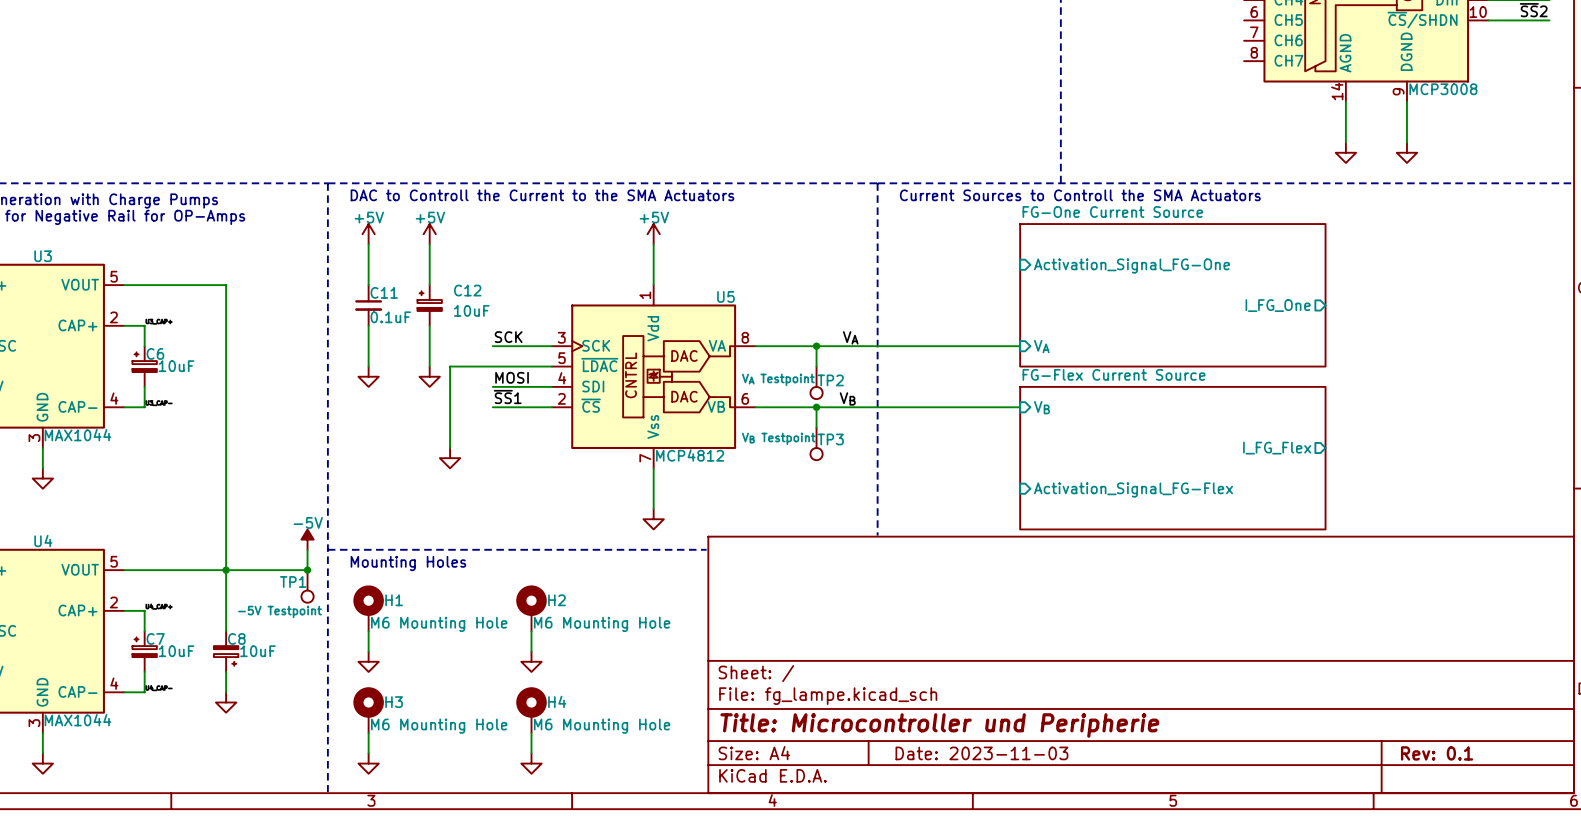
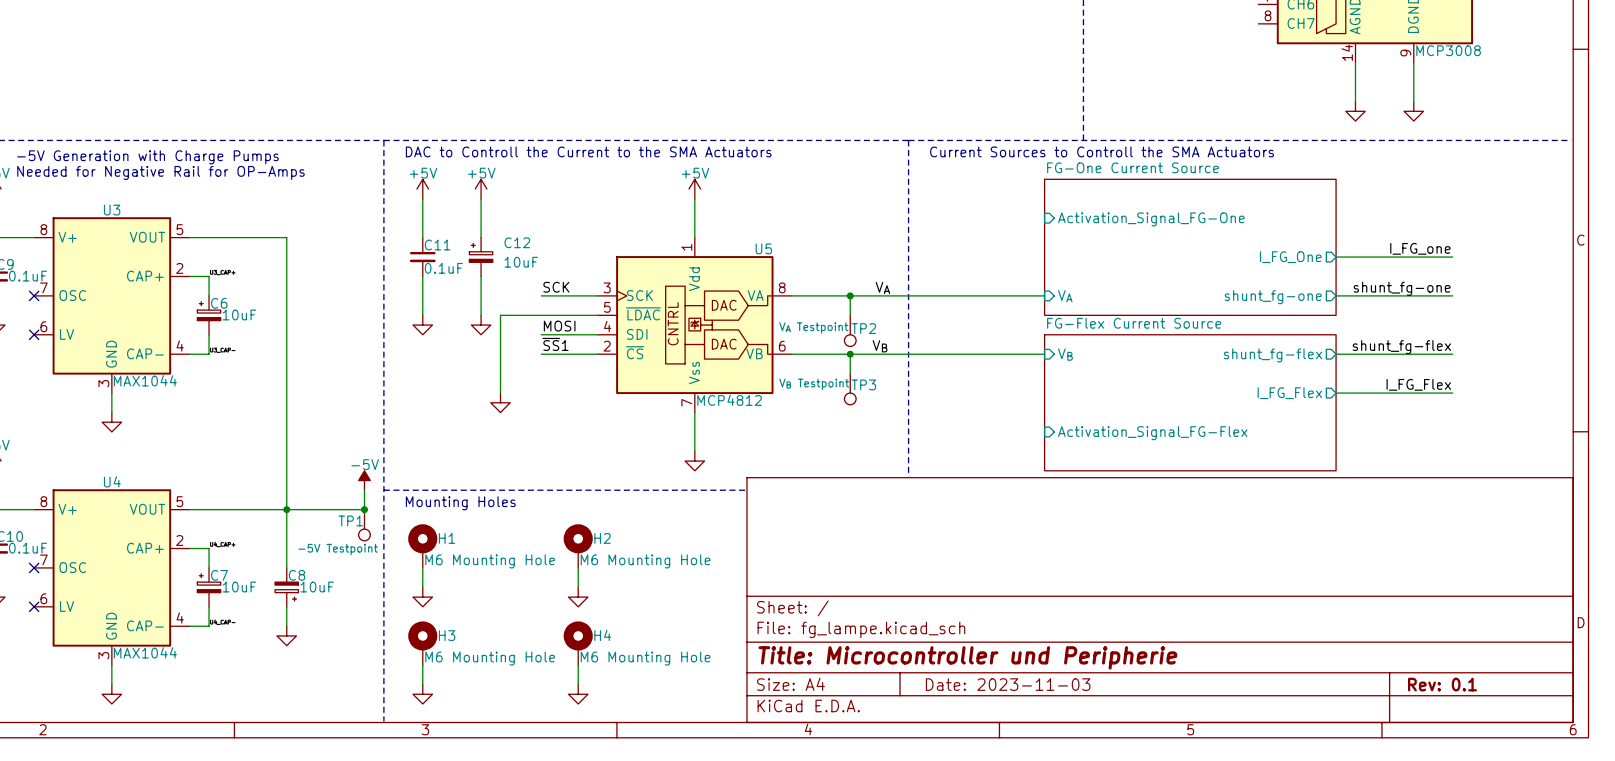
label: none -> I_FG_one (1420, 248)
wire: none -> (1336, 257) (1452, 257)
label: none -> shunt_fg-one (1402, 288)
wire: none -> (1336, 295) (1452, 295)
sheet pin: none -> shunt_fg-one (1273, 297)
label: none -> shunt_fg-flex (1401, 347)
wire: none -> (1336, 354) (1452, 354)
sheet pin: none -> shunt_fg-flex (1272, 355)
label: none -> I_FG_Flex (1418, 384)
wire: none -> (1336, 393) (1452, 393)

